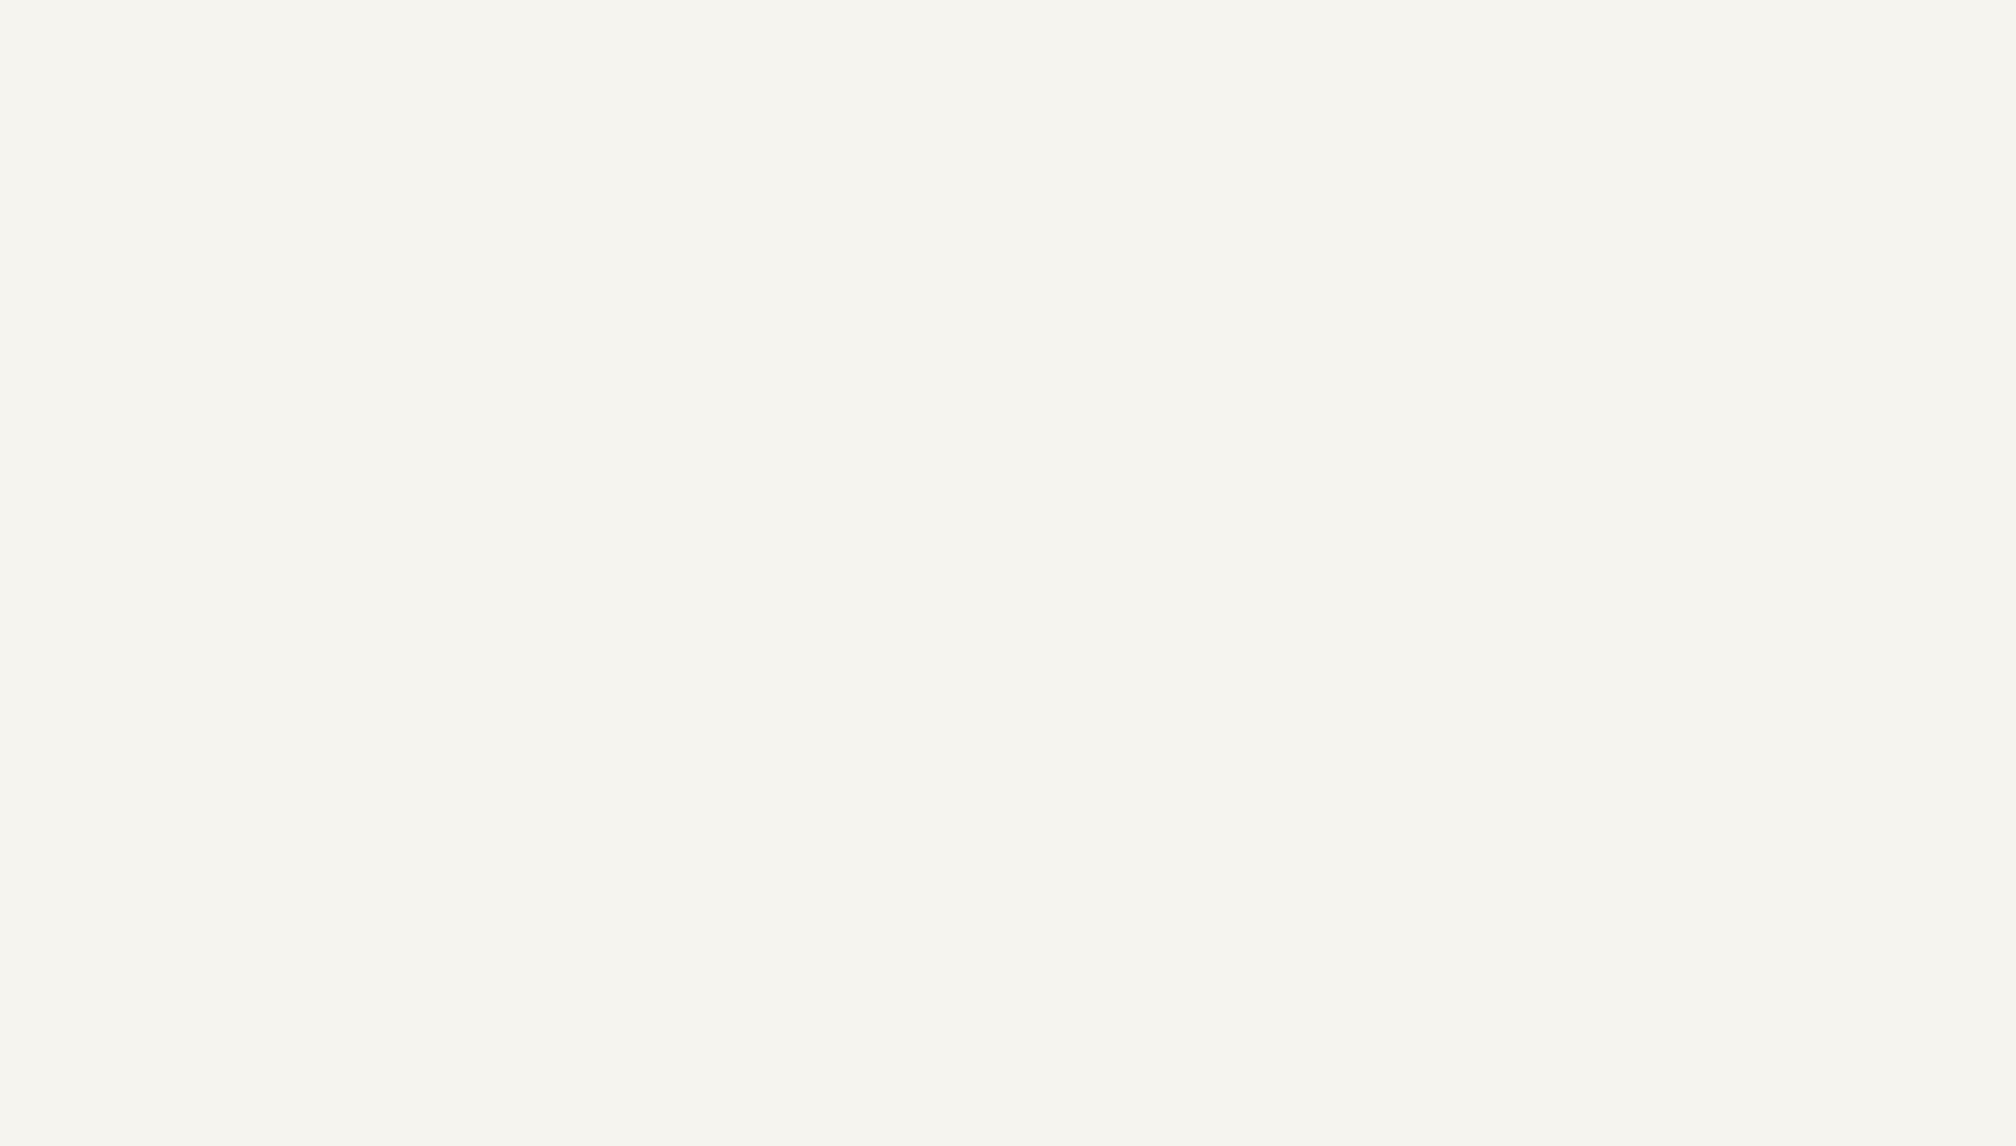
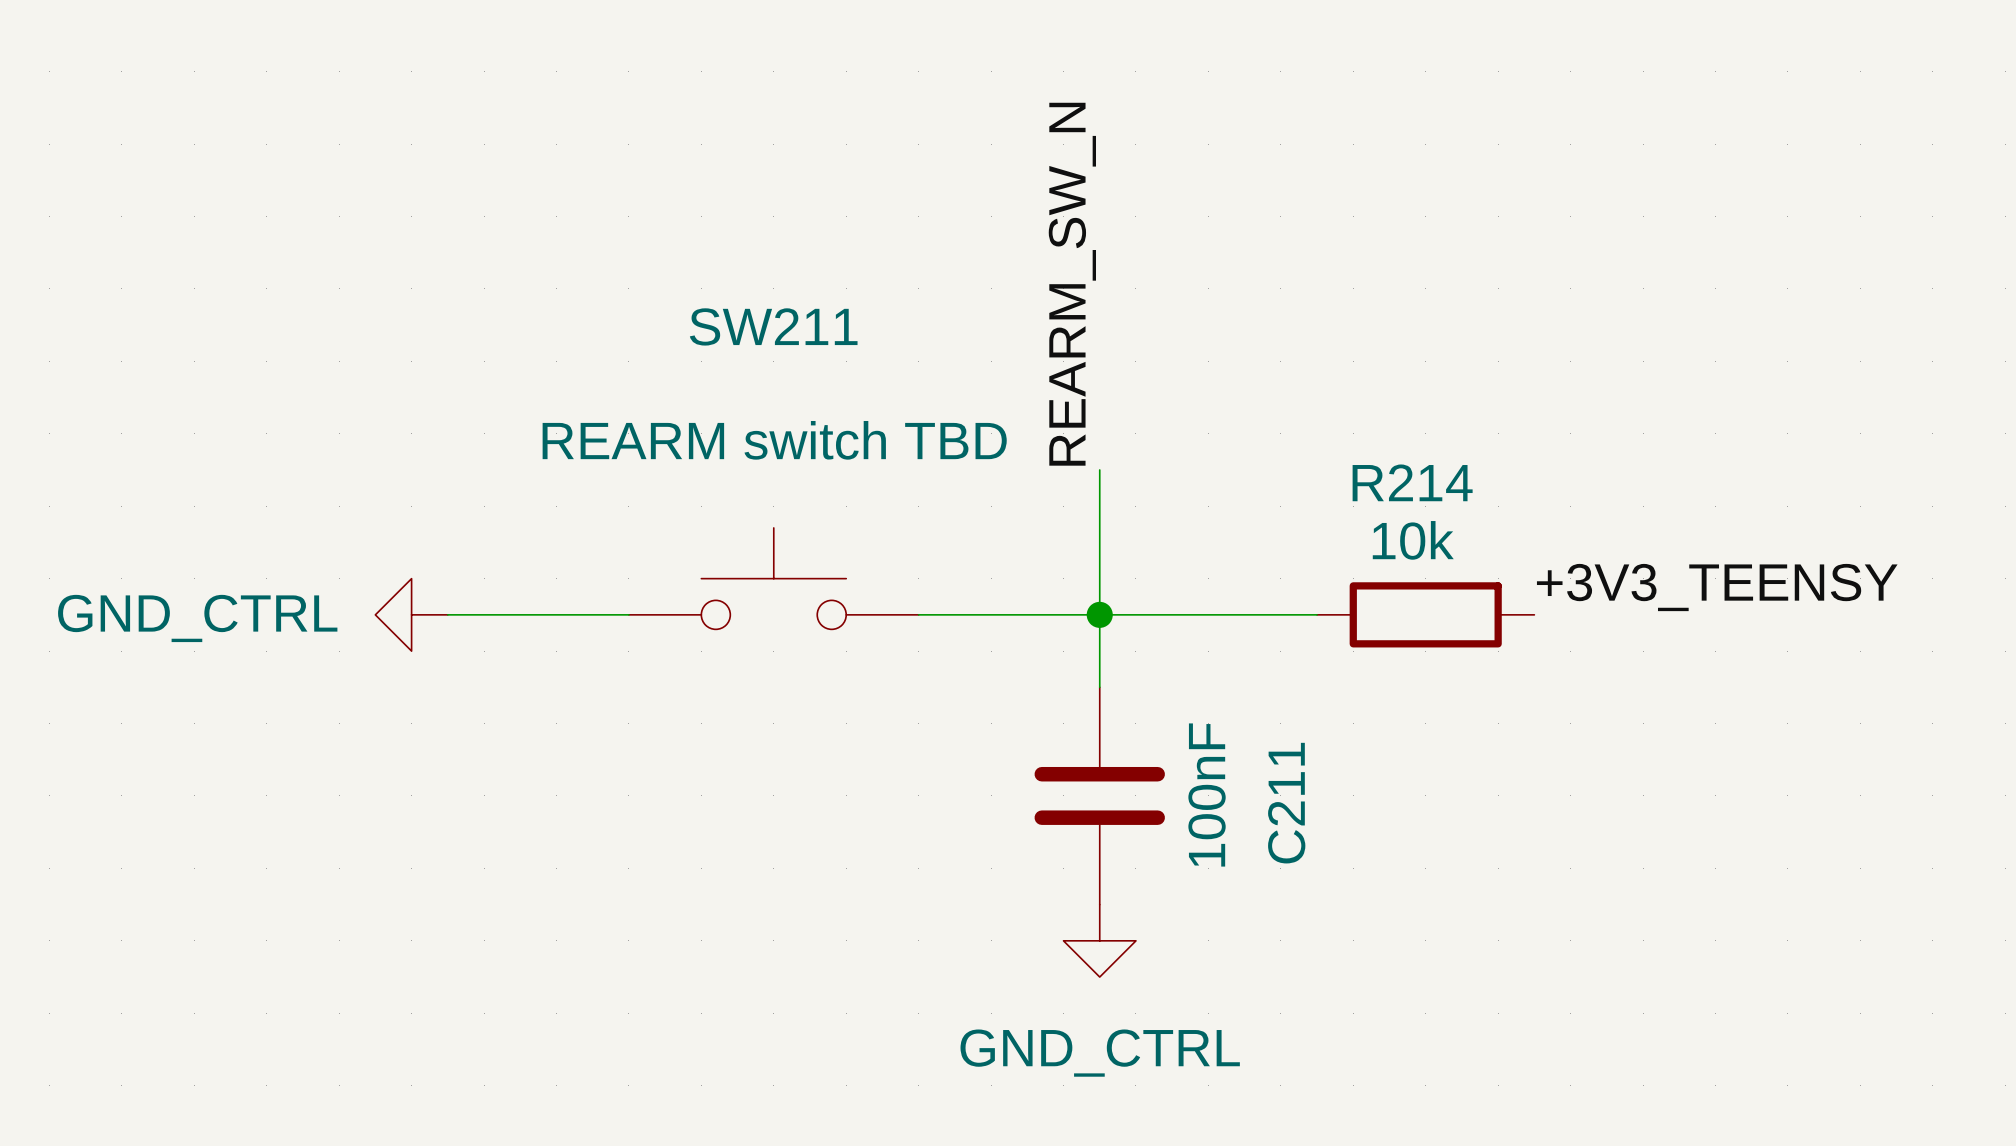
label: none -> REARM_SW_N (1072, 284)
wire: none -> (1099, 469) (1099, 687)
SW211: none -> REARM switch TBD (773, 578)
label: none -> +3V3_TEENSY (1717, 587)
power symbol: none -> GND_CTRL (411, 614)
wire: none -> (447, 614) (628, 614)
wire: none -> (918, 614) (1317, 614)
junction: none -> (1099, 614)
R214: none -> 10k (1425, 614)
C211: none -> 100nF (1099, 795)
power symbol: none -> GND_CTRL (1099, 940)

